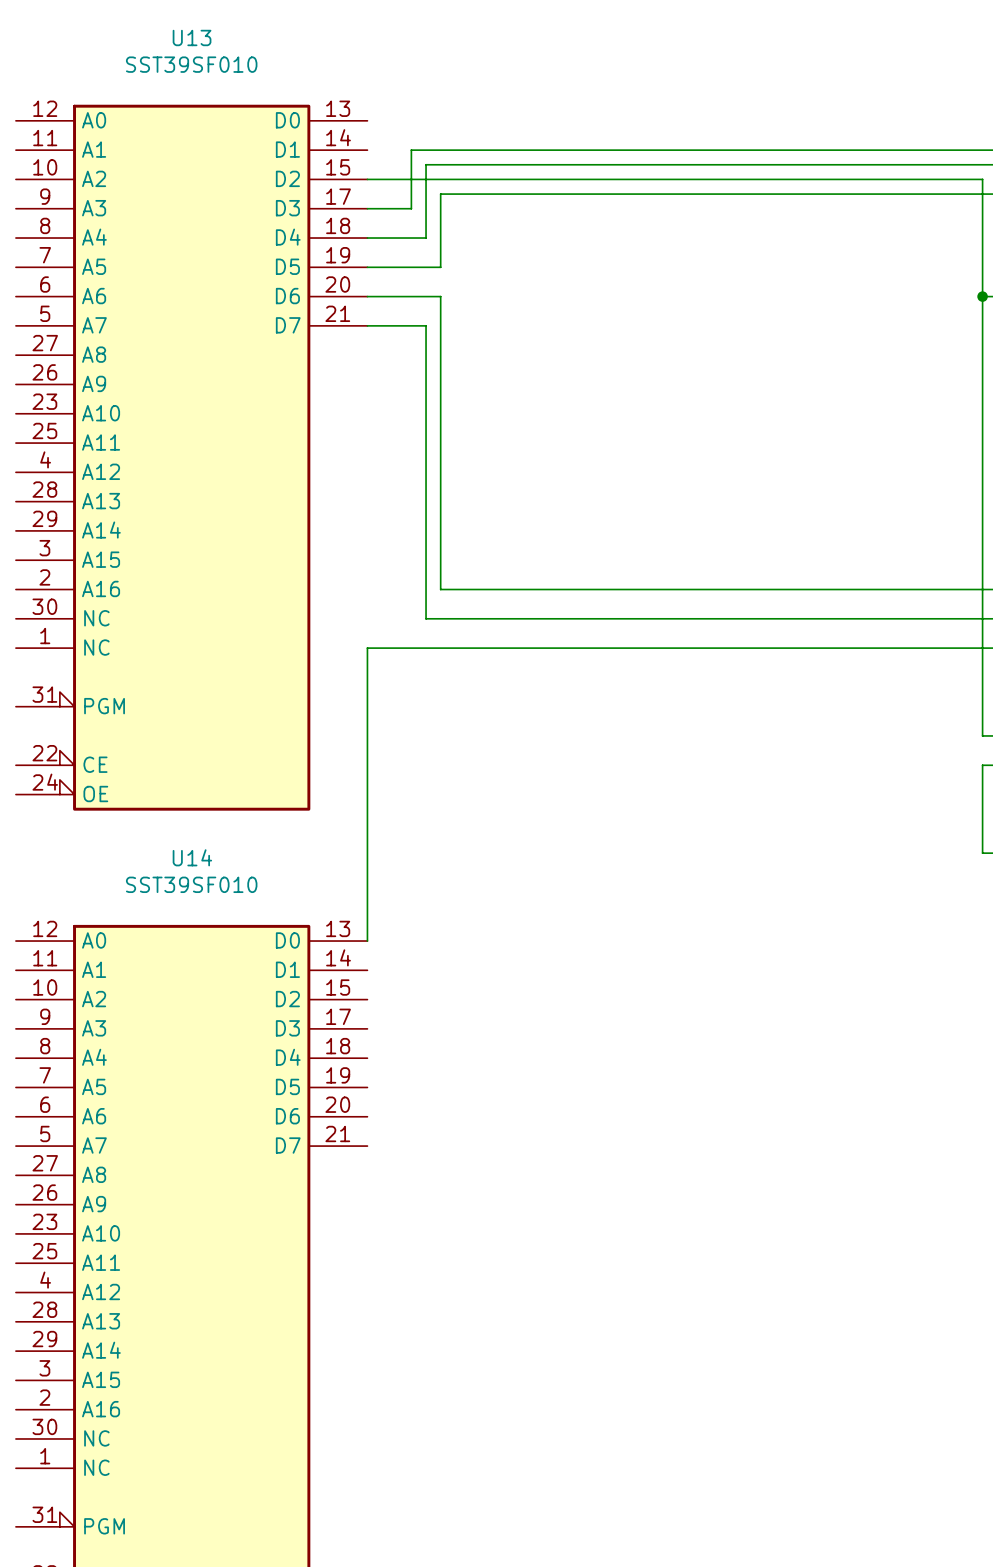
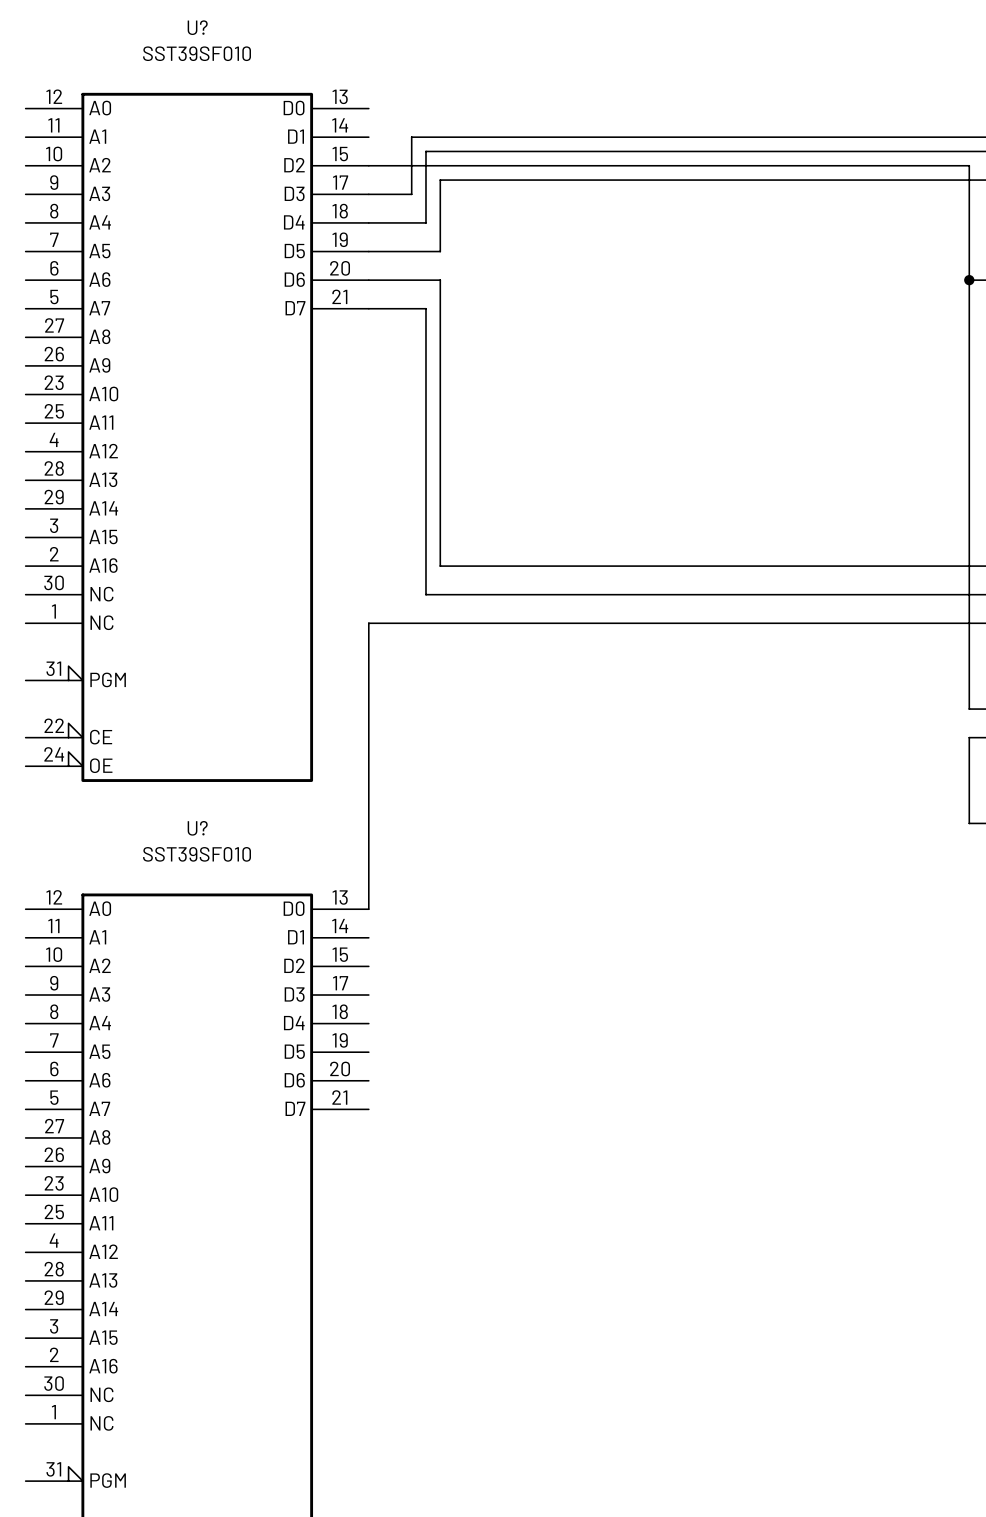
U13 name: U13 (192, 37) -> U? (197, 27)
U14 name: U14 (192, 857) -> U? (197, 828)

